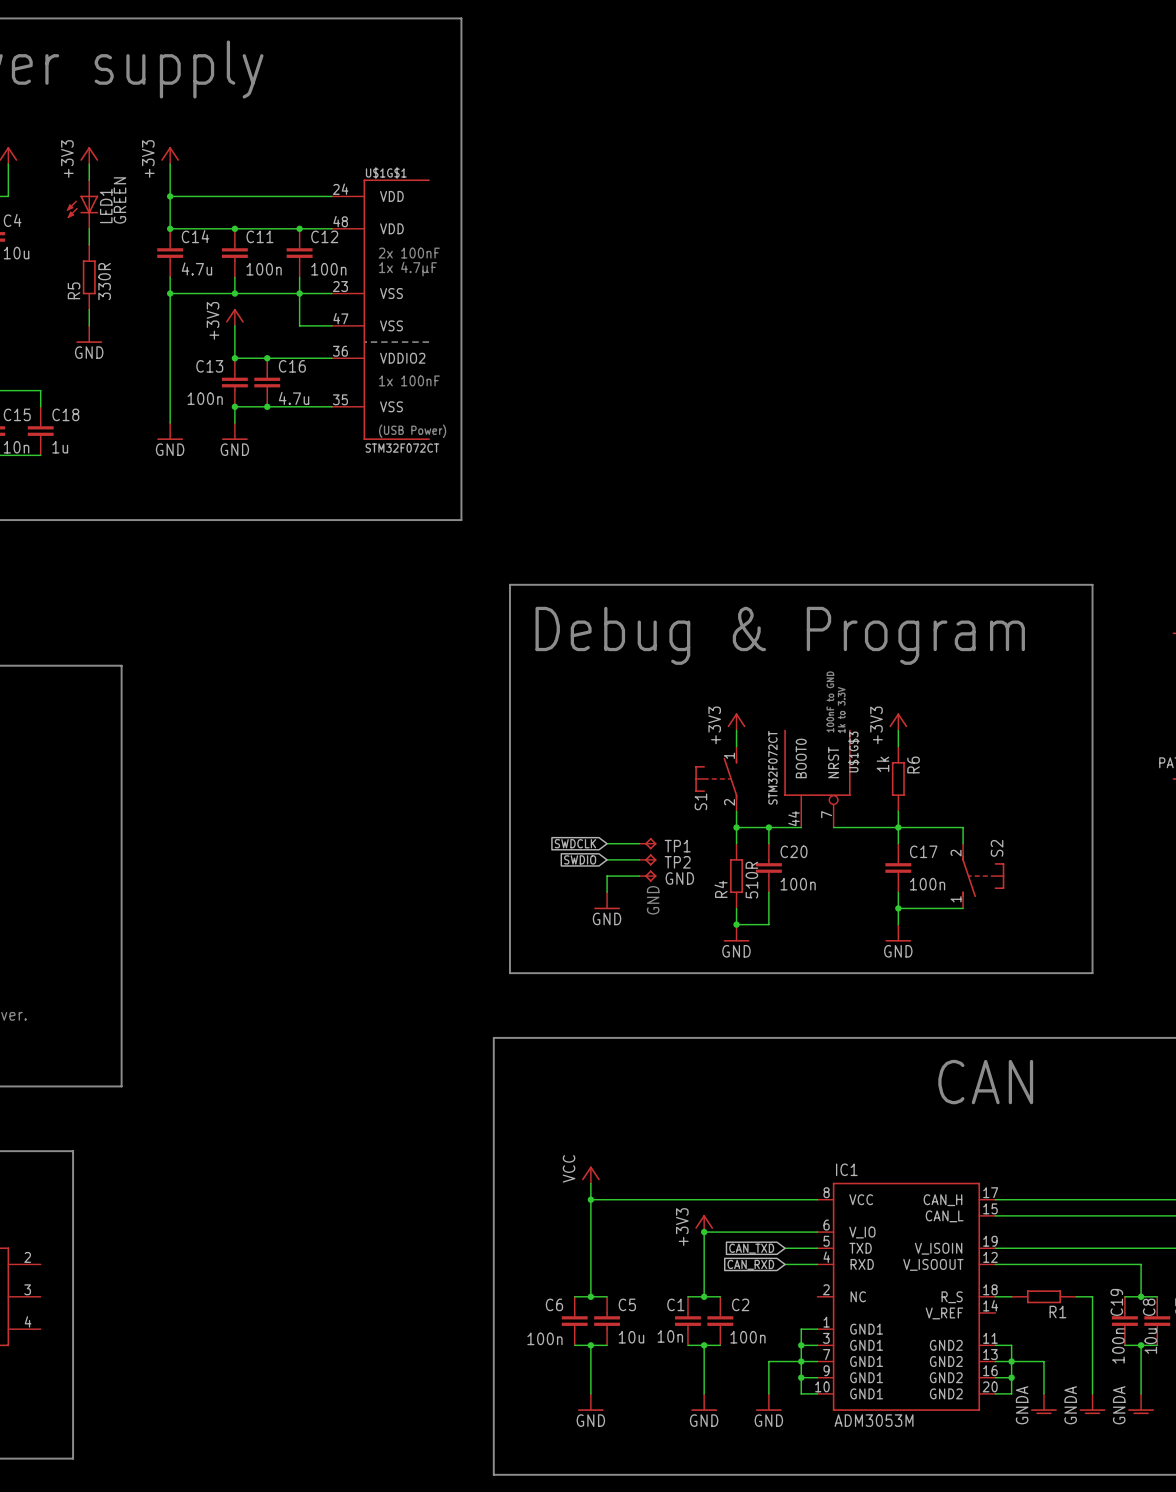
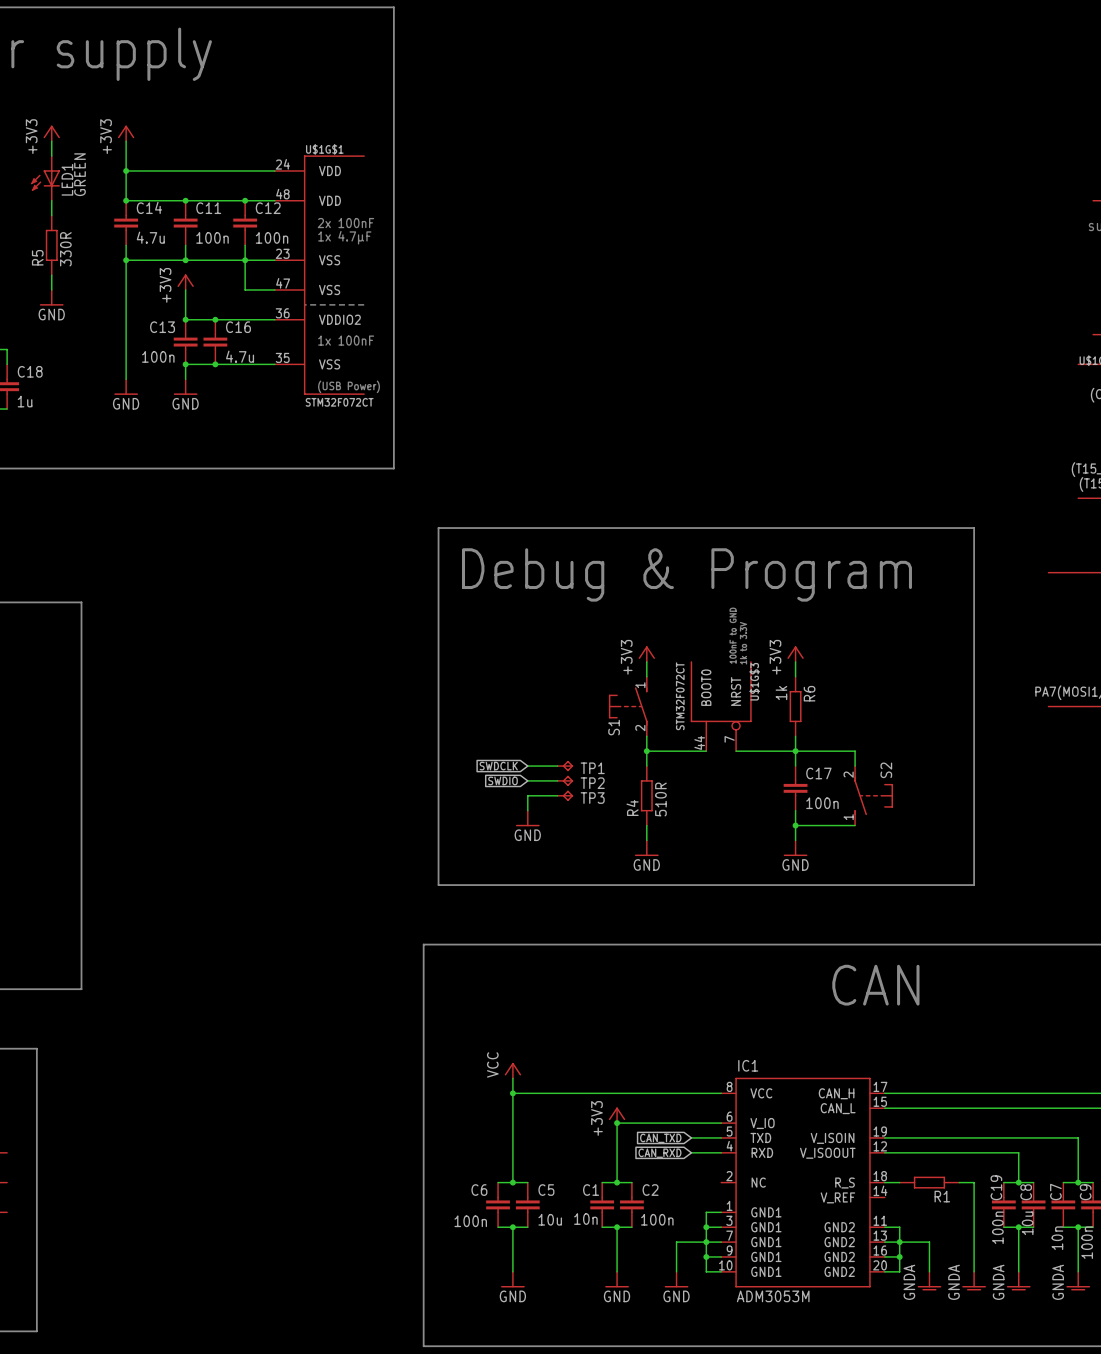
wire: (768, 827) (768, 843) -> none
junction: (768, 827) -> none
C20: 100n (768, 867) -> none
GND name: GND (679, 878) -> TP3 (592, 798)
wire: (768, 892) (768, 924) (736, 924) -> none
GND text: GND (653, 900) -> none
junction: (736, 924) -> none

